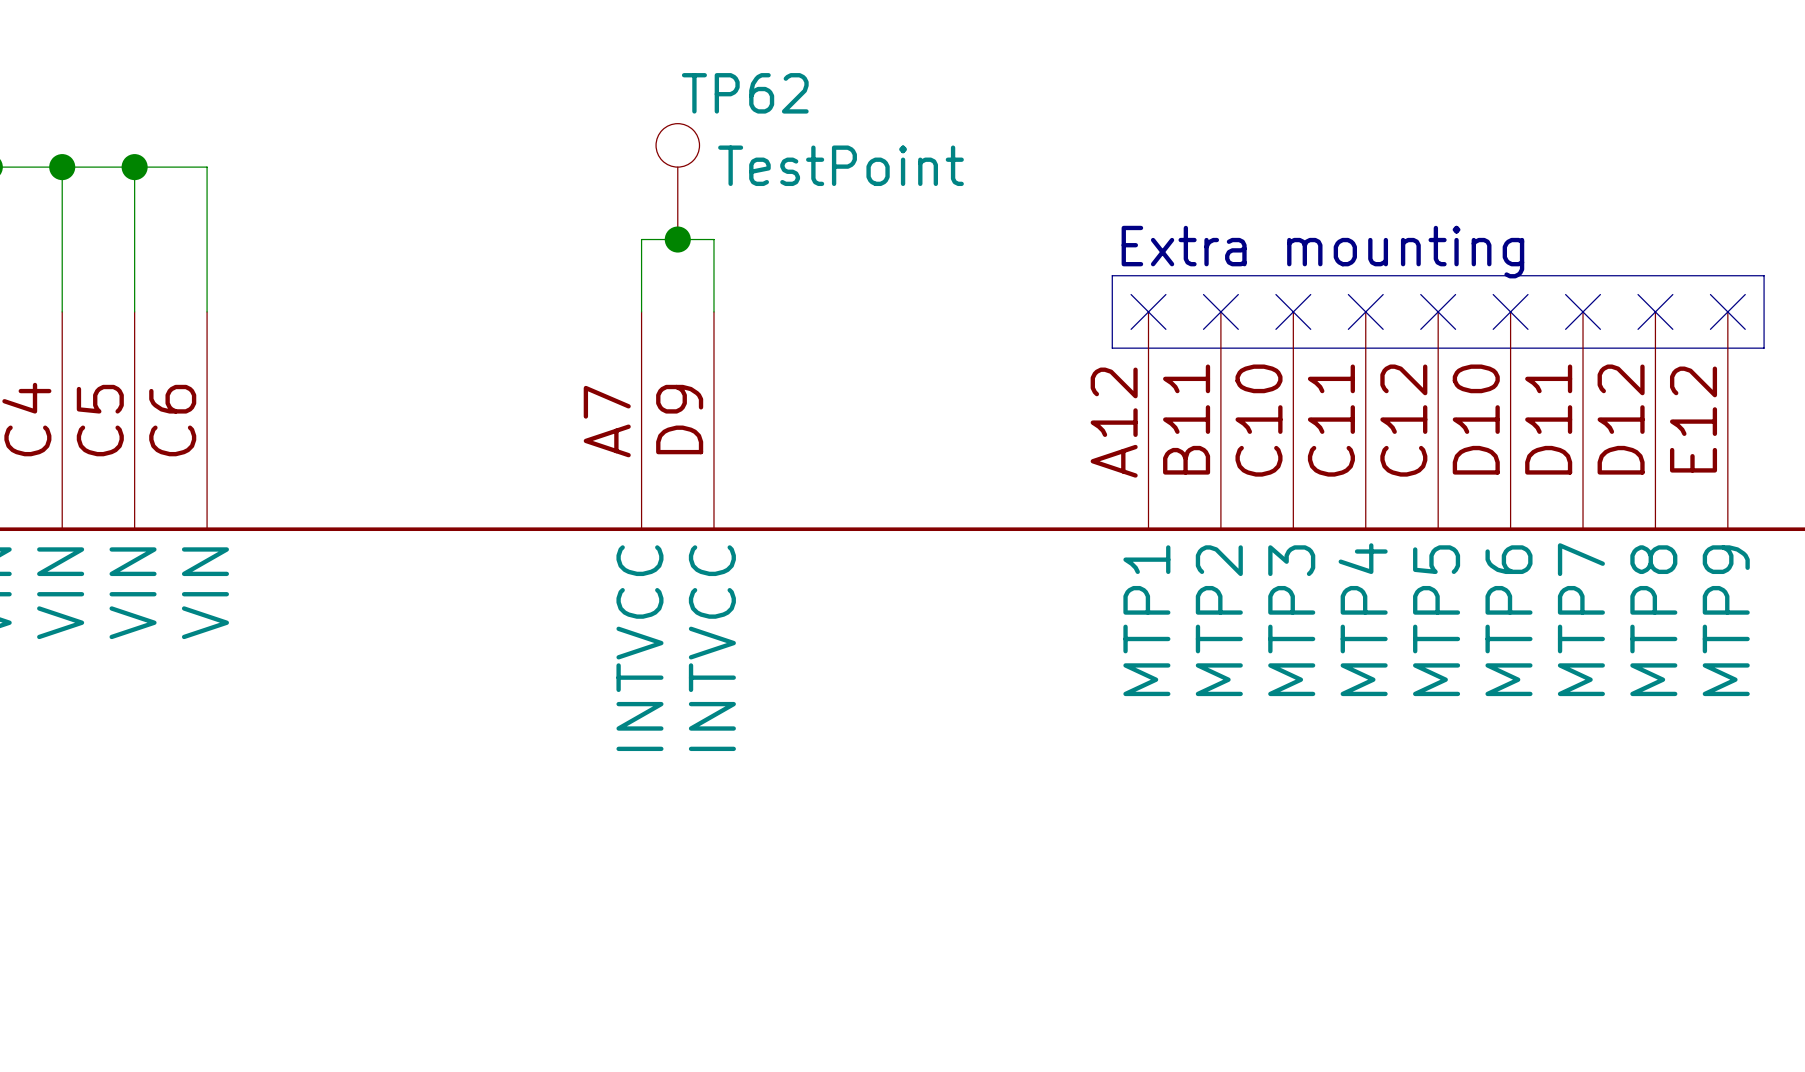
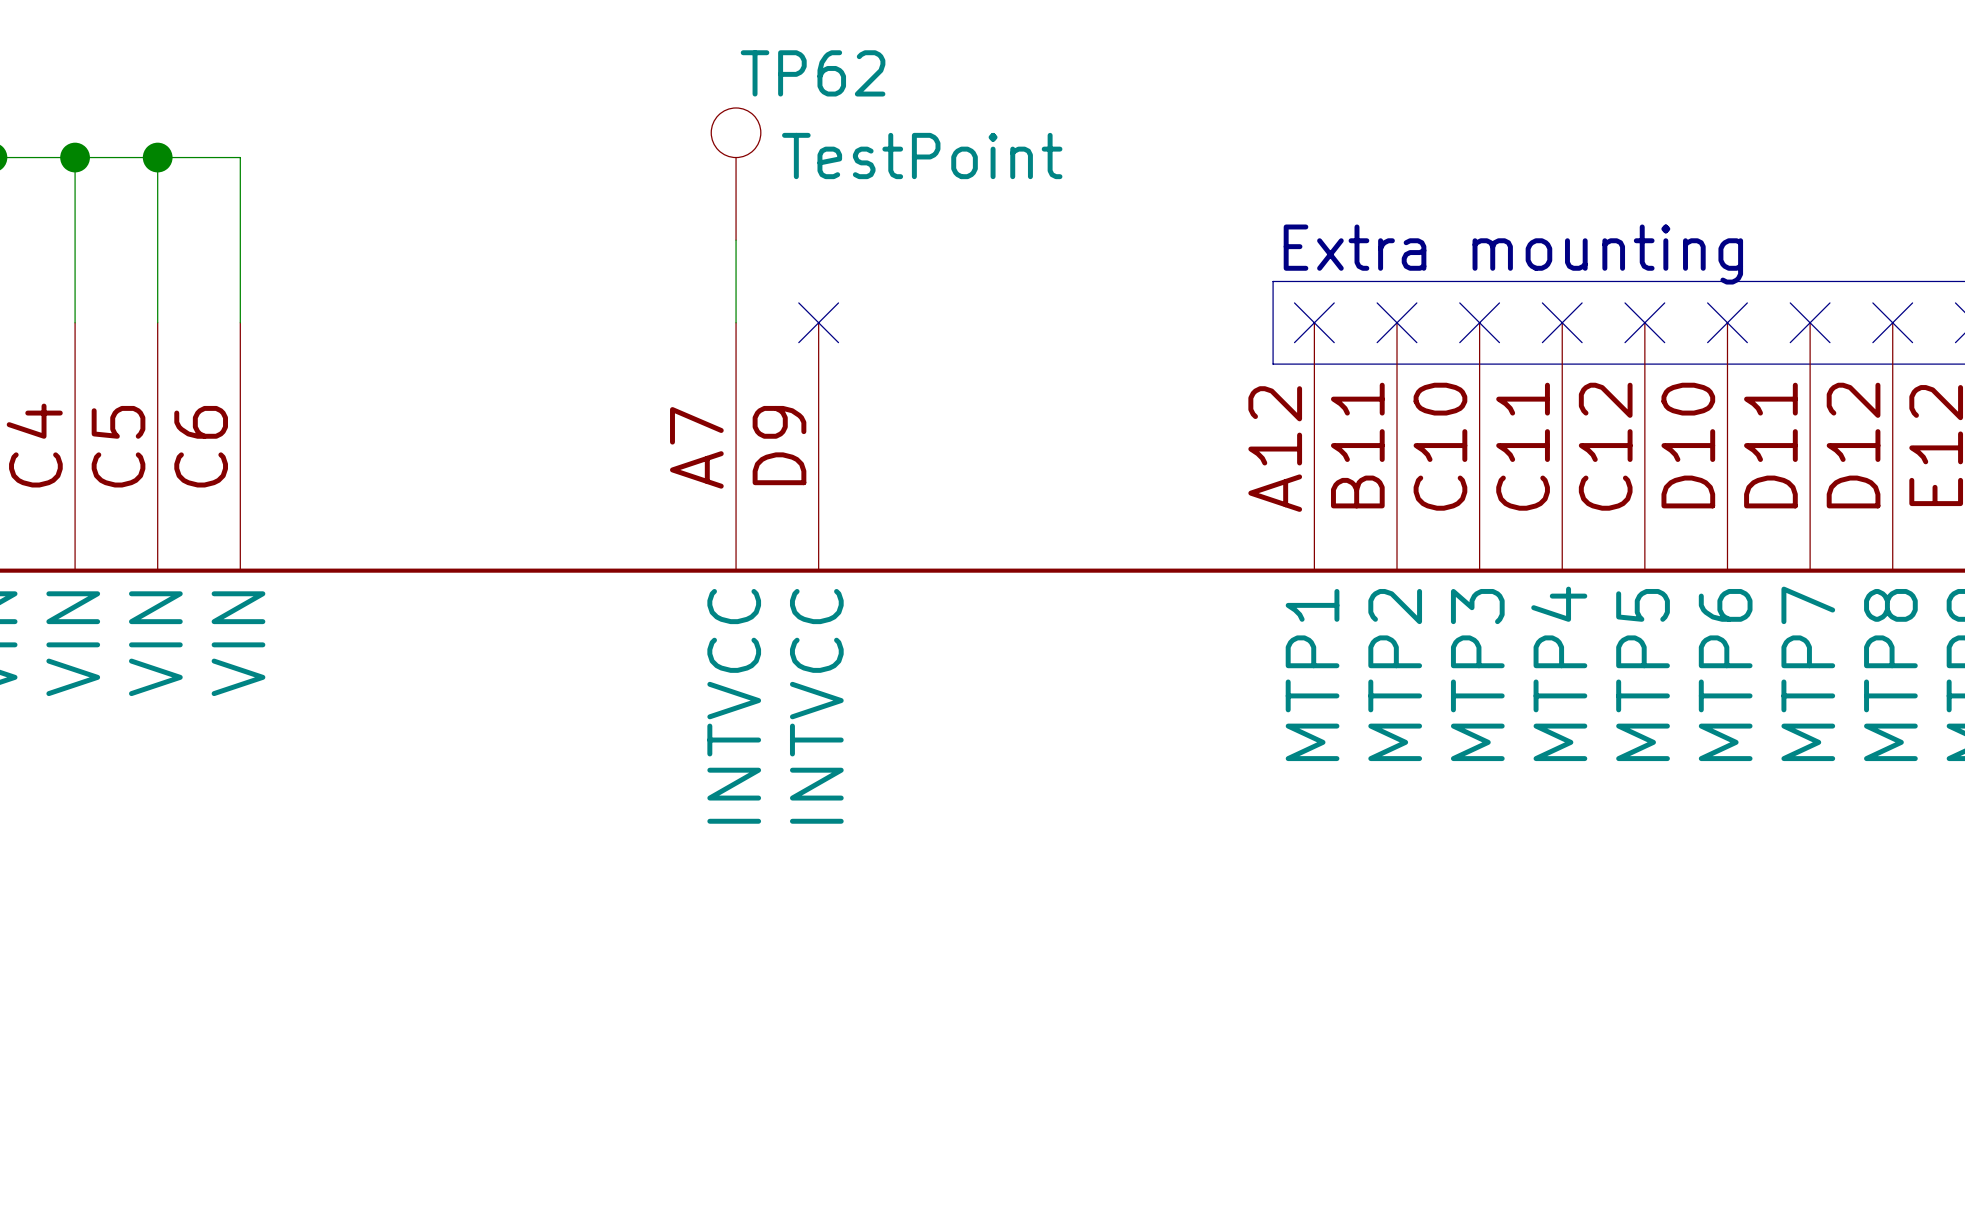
TP62 position: (677, 181) -> (736, 174)
wire: (641, 239) (713, 239) (713, 311) -> none
junction: (677, 239) -> none
no-connect mark: none -> (818, 322)

